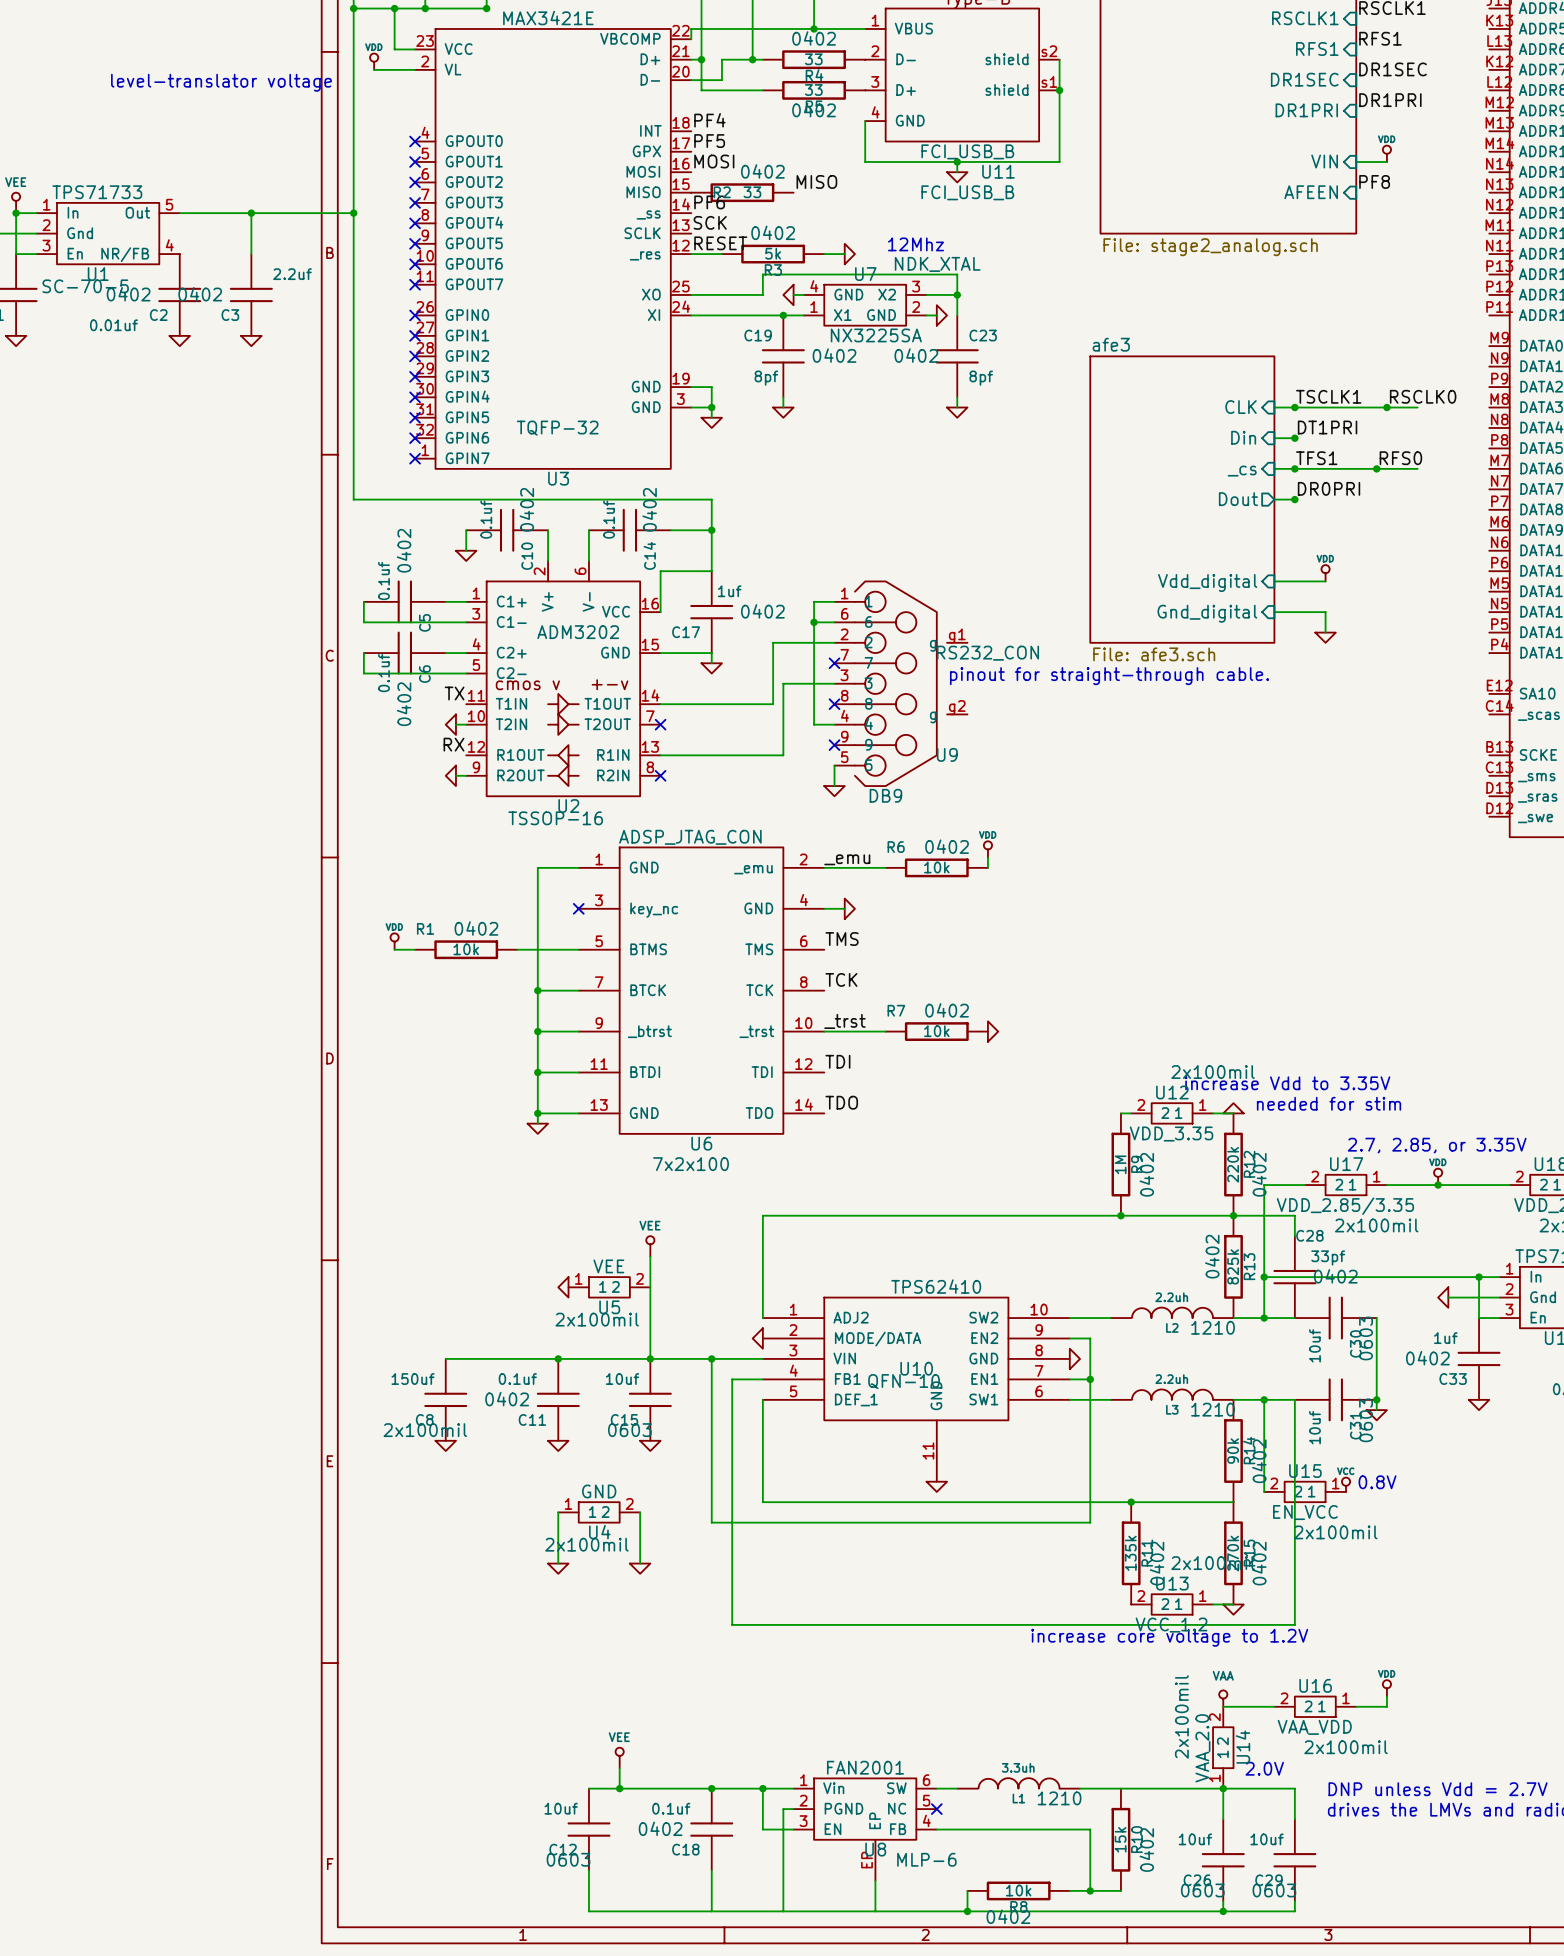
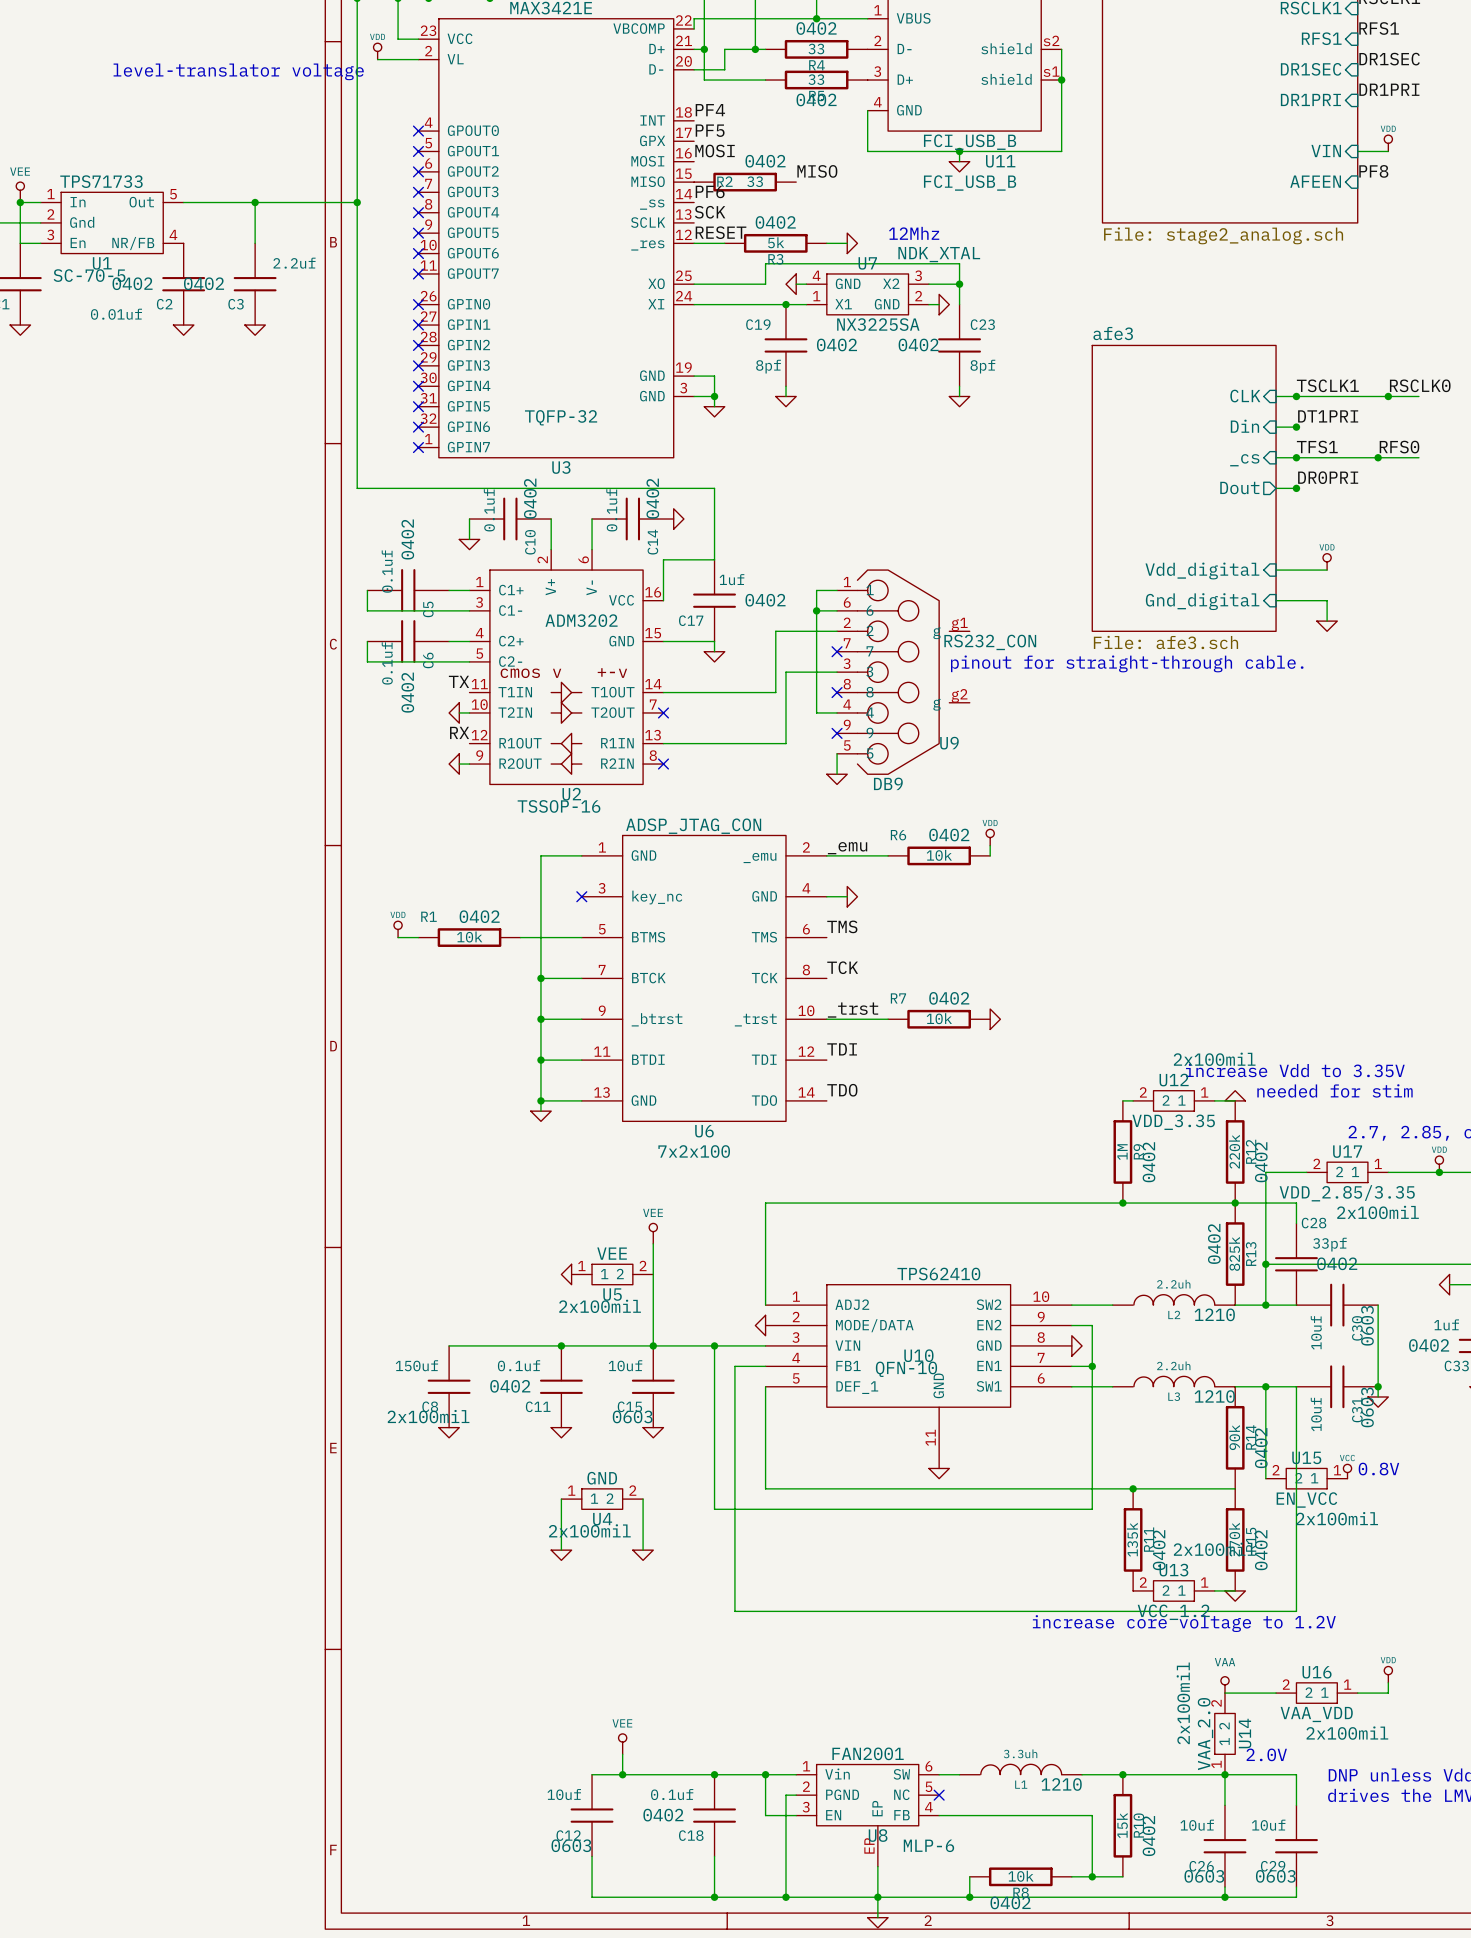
wire: (670, 530) (711, 530) -> none
power symbol: none -> (678, 519)
junction: (711, 530) -> none
junction: none -> (1122, 1774)
junction: none -> (714, 1897)
junction: none -> (786, 1897)
wire: none -> (877, 1897) (877, 1917)
junction: none -> (877, 1897)
power symbol: none -> (877, 1922)

